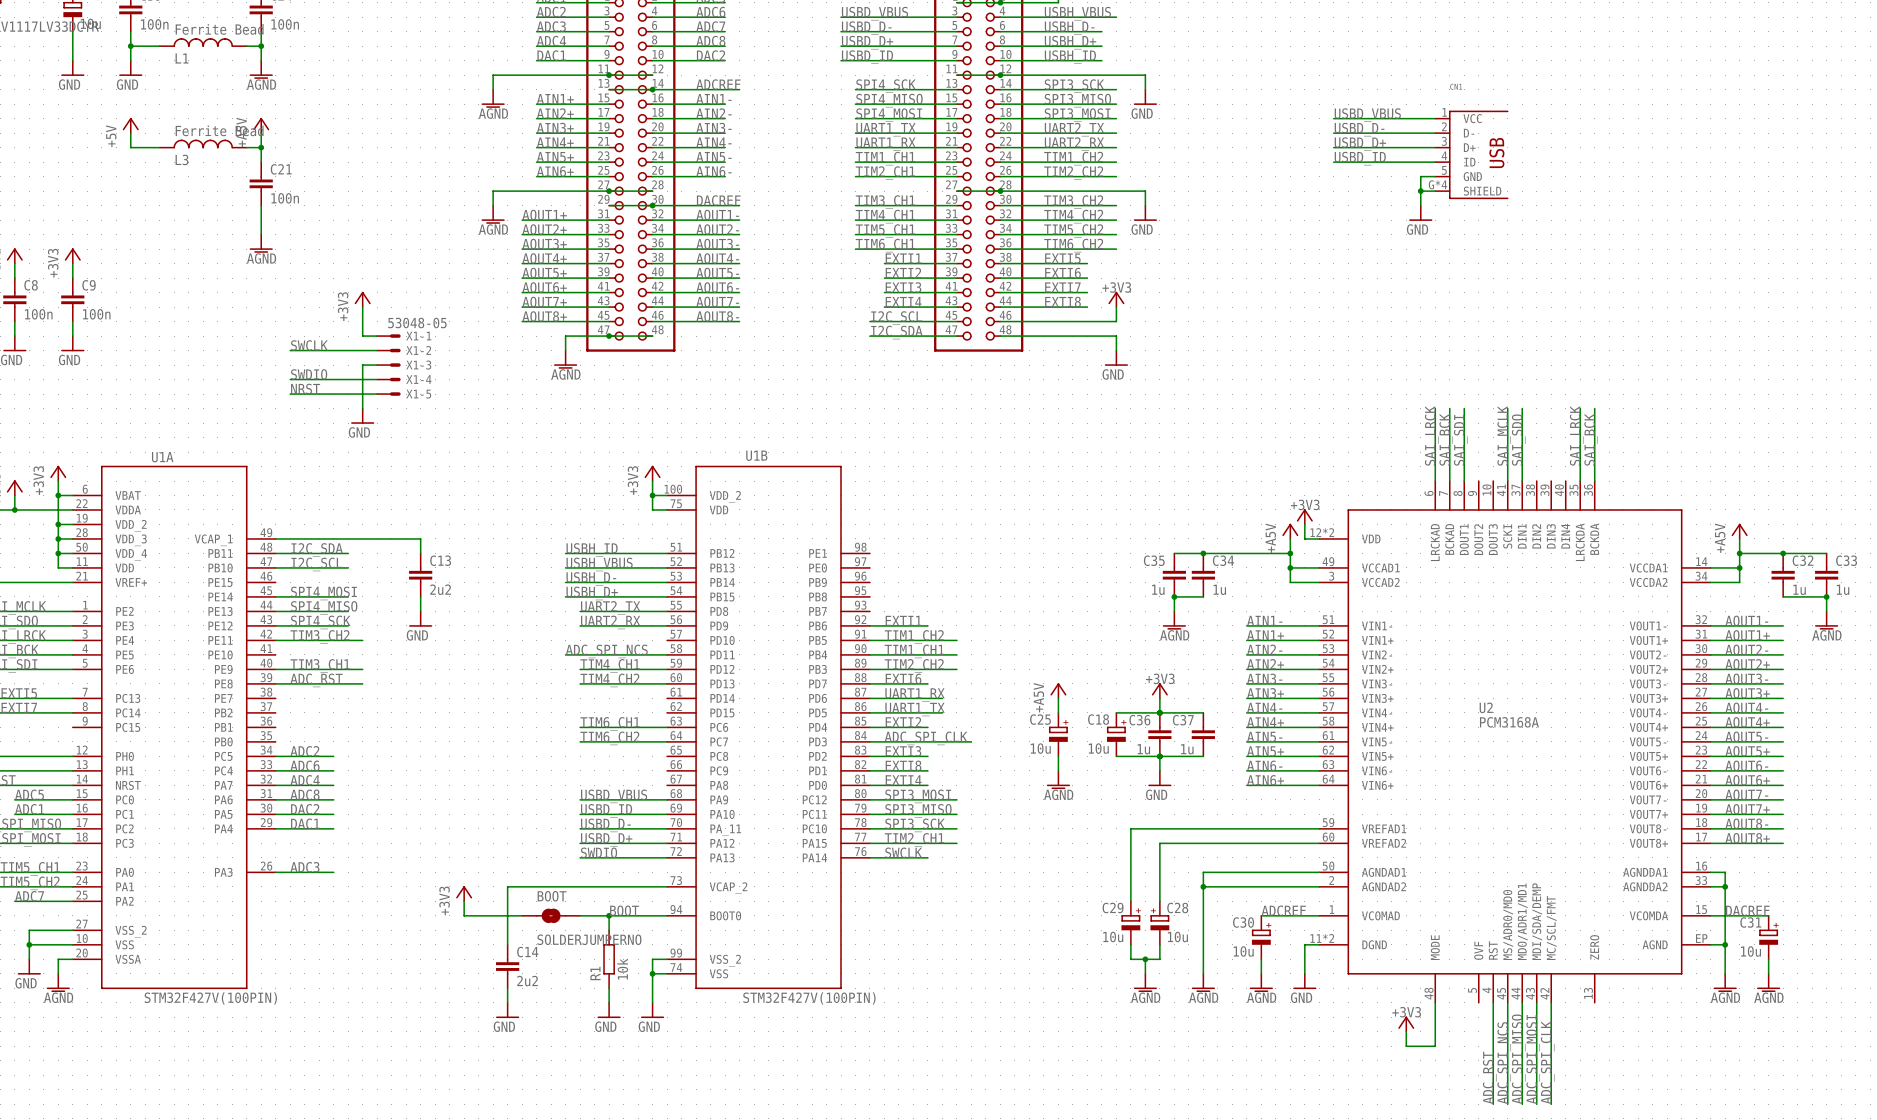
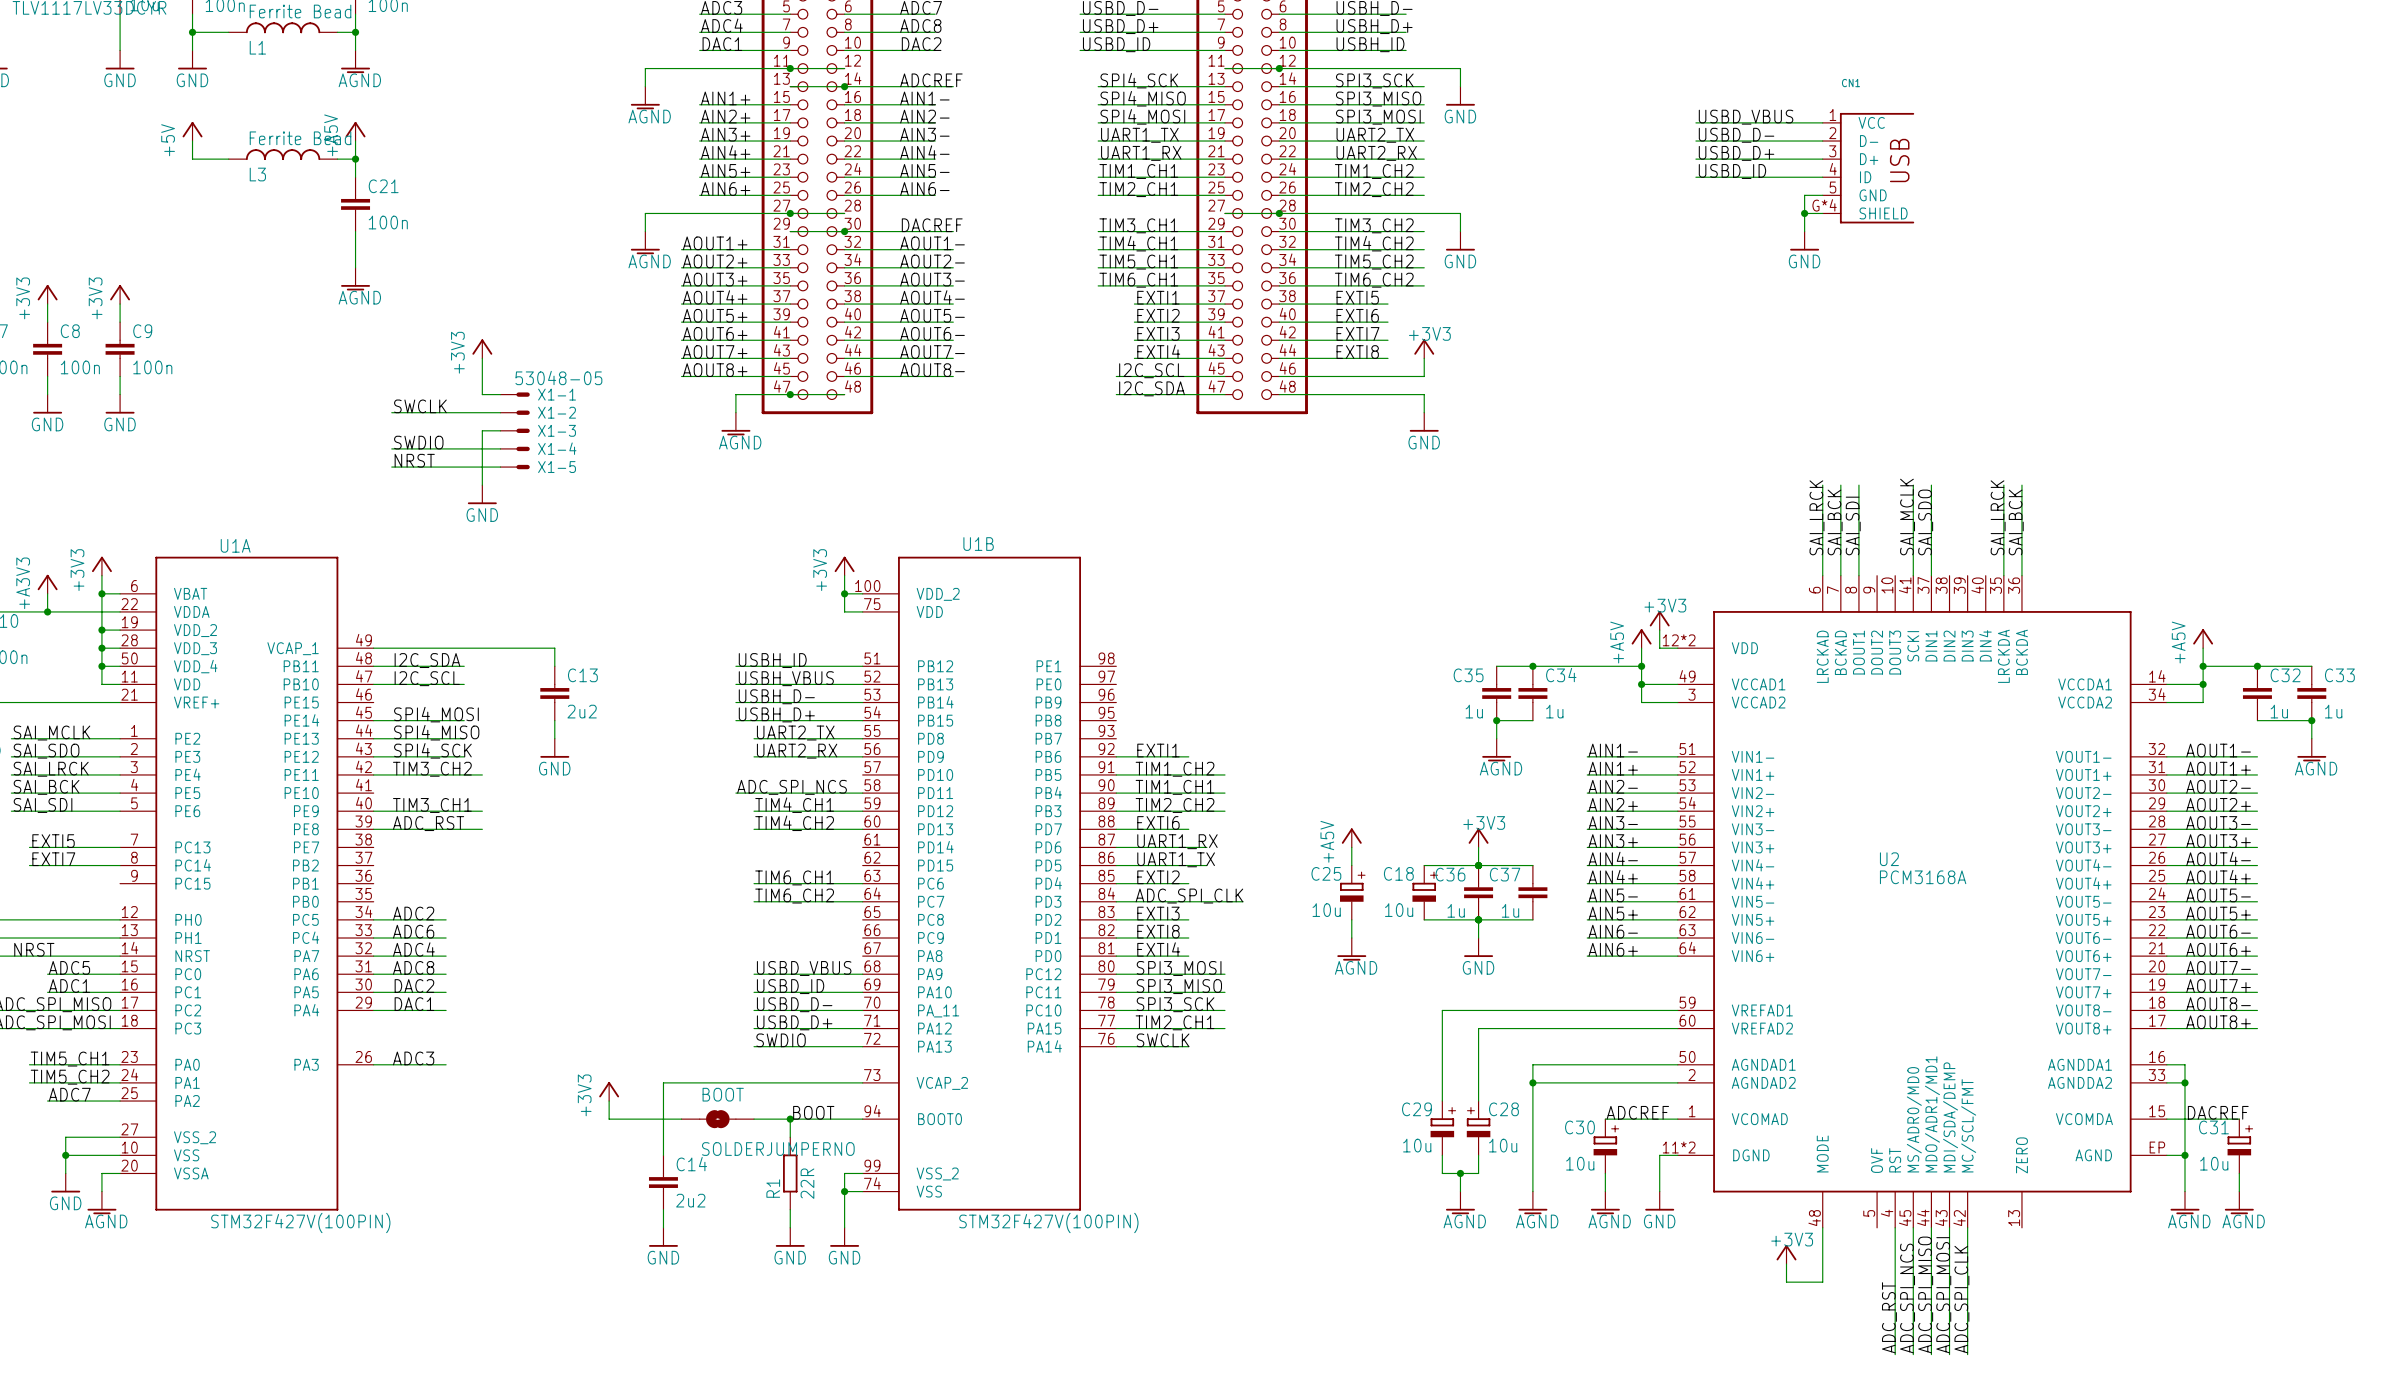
R1 value: 10k (622, 969) -> 22R (807, 1183)

